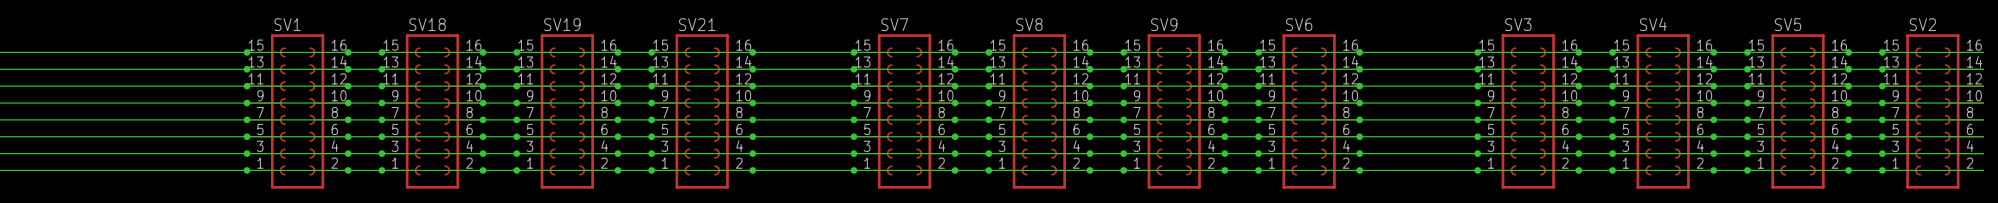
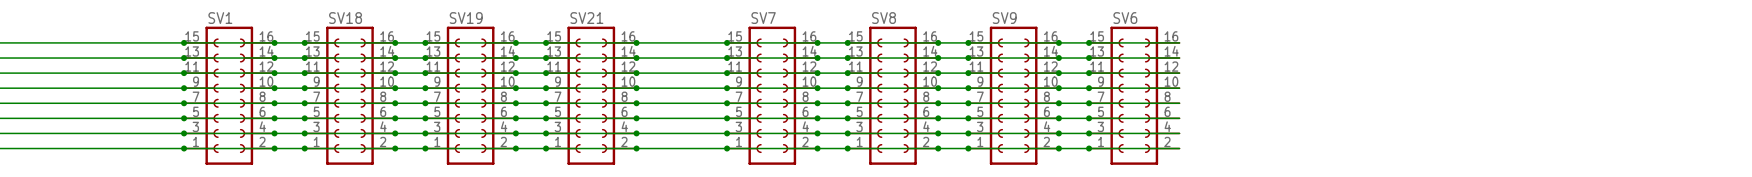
wire: (1359, 52) (1983, 52) -> none
junction: (1359, 52) -> none
junction: (1477, 52) -> none
junction: (1578, 52) -> none
junction: (1612, 52) -> none
junction: (1713, 52) -> none
junction: (1747, 52) -> none
junction: (1848, 52) -> none
junction: (1882, 52) -> none
wire: (1359, 69) (1983, 69) -> none
junction: (1359, 69) -> none
junction: (1477, 69) -> none
junction: (1578, 69) -> none
junction: (1612, 69) -> none
junction: (1713, 69) -> none
junction: (1747, 69) -> none
junction: (1848, 69) -> none
junction: (1882, 69) -> none
wire: (1359, 86) (1983, 86) -> none
junction: (1359, 86) -> none
junction: (1477, 86) -> none
junction: (1578, 86) -> none
junction: (1612, 86) -> none
junction: (1713, 86) -> none
junction: (1747, 86) -> none
junction: (1848, 86) -> none
junction: (1882, 86) -> none
wire: (1359, 103) (1983, 103) -> none
junction: (1359, 103) -> none
junction: (1477, 103) -> none
junction: (1578, 103) -> none
junction: (1612, 103) -> none
junction: (1713, 103) -> none
junction: (1747, 103) -> none
junction: (1848, 103) -> none
junction: (1882, 103) -> none
SV3: (1528, 111) -> none
SV4: (1663, 111) -> none
SV5: (1798, 111) -> none
SV2: (1932, 111) -> none
wire: (1359, 119) (1983, 119) -> none
junction: (1359, 119) -> none
junction: (1477, 119) -> none
junction: (1578, 119) -> none
junction: (1612, 119) -> none
junction: (1713, 119) -> none
junction: (1747, 119) -> none
junction: (1848, 119) -> none
junction: (1882, 119) -> none
wire: (1359, 136) (1983, 136) -> none
junction: (1359, 136) -> none
junction: (1477, 136) -> none
junction: (1578, 136) -> none
junction: (1612, 136) -> none
junction: (1713, 136) -> none
junction: (1747, 136) -> none
junction: (1848, 136) -> none
junction: (1882, 136) -> none
wire: (1359, 153) (1983, 153) -> none
junction: (1359, 153) -> none
junction: (1477, 153) -> none
junction: (1578, 153) -> none
junction: (1612, 153) -> none
junction: (1713, 153) -> none
junction: (1747, 153) -> none
junction: (1848, 153) -> none
junction: (1882, 153) -> none
wire: (1359, 170) (1983, 170) -> none
junction: (1359, 170) -> none
junction: (1477, 170) -> none
junction: (1578, 170) -> none
junction: (1612, 170) -> none
junction: (1713, 170) -> none
junction: (1747, 170) -> none
junction: (1848, 170) -> none
junction: (1882, 170) -> none

